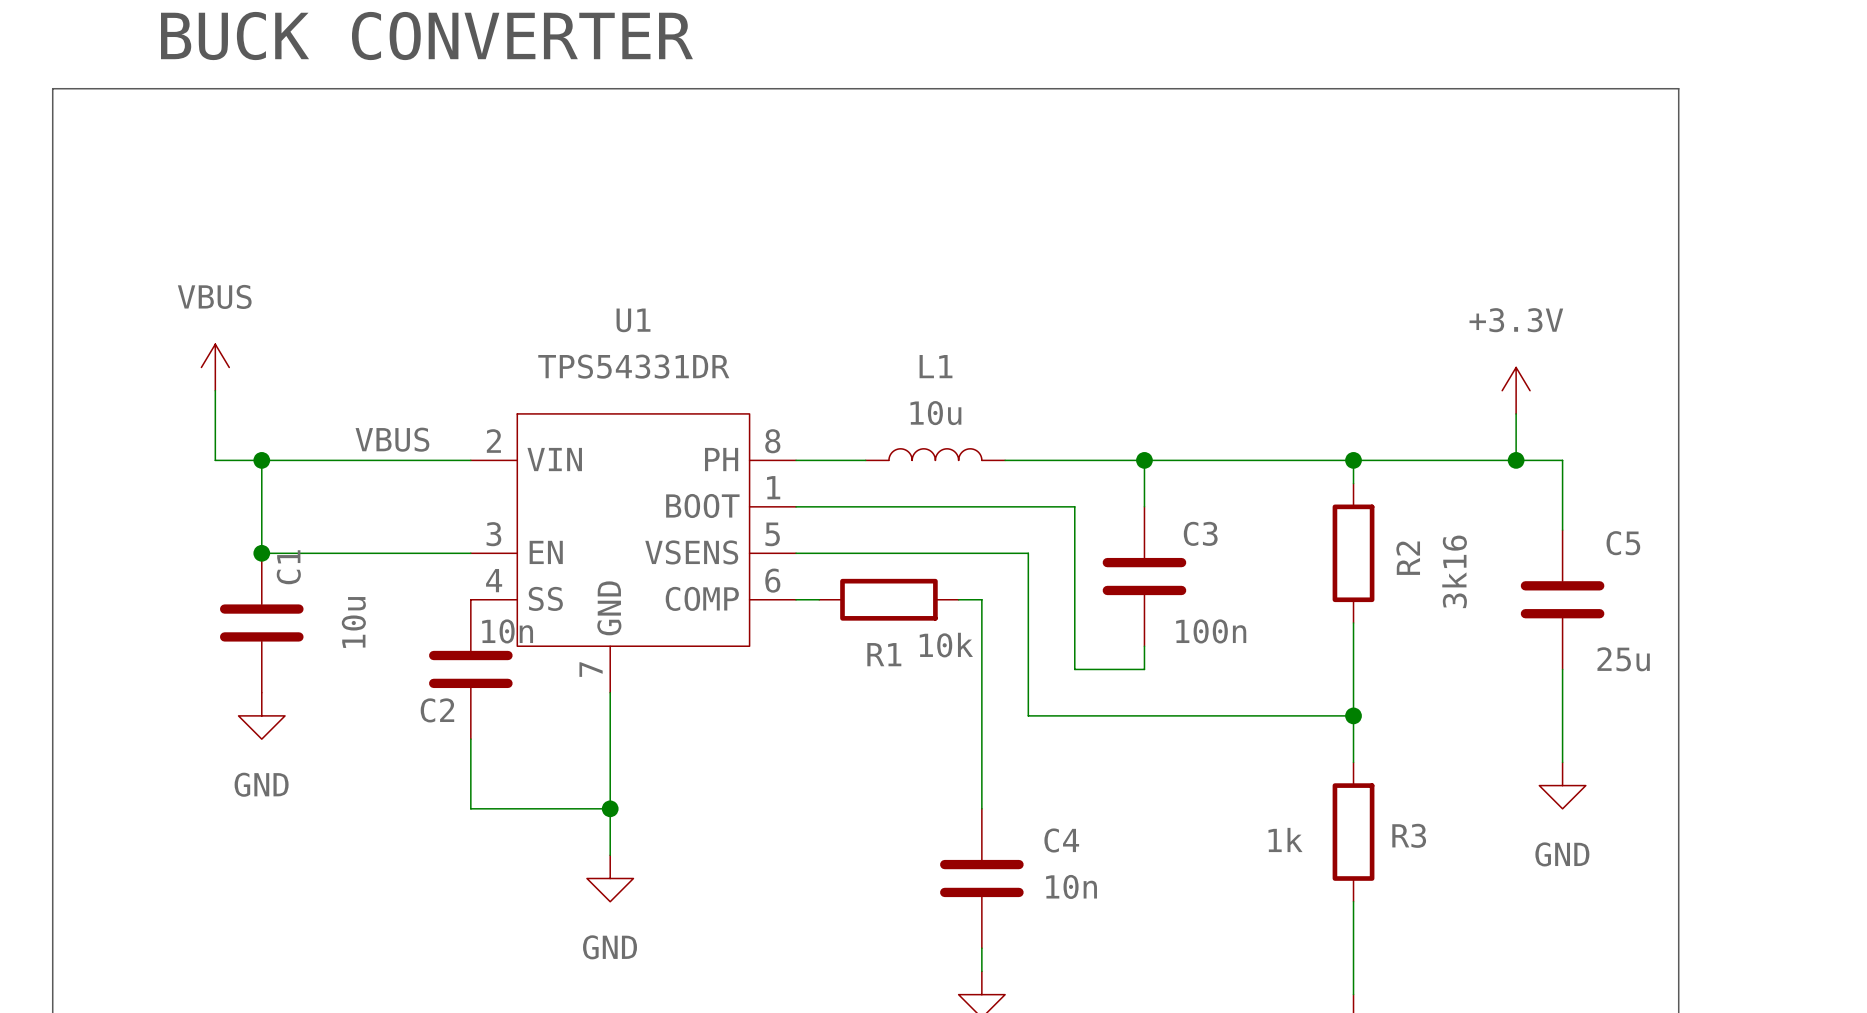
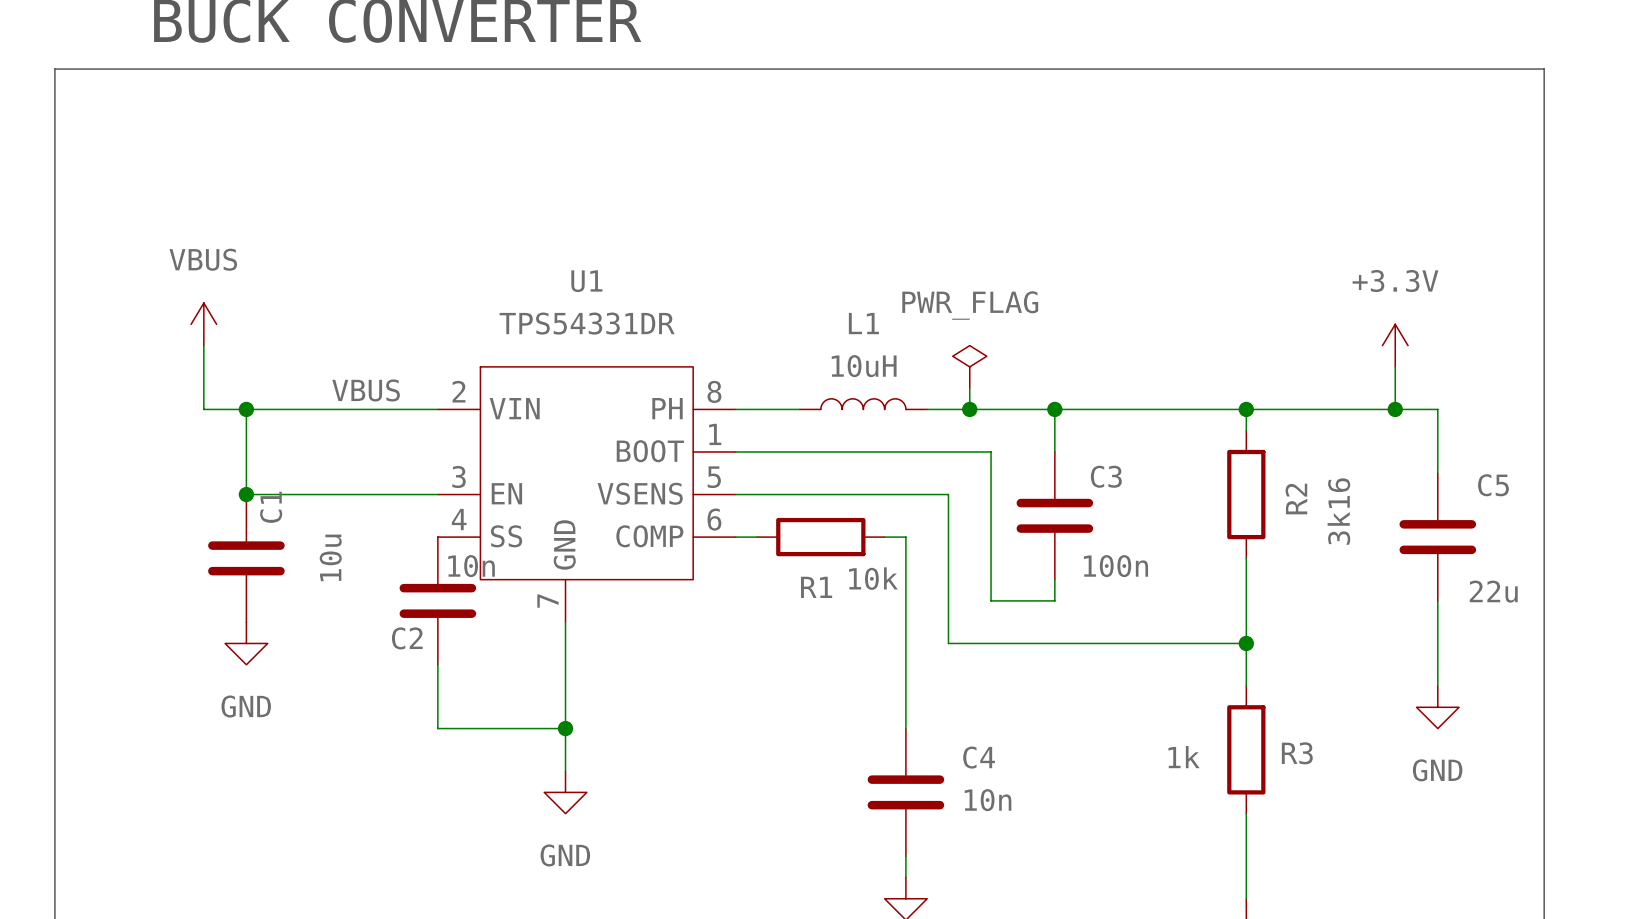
L1 value: 10u (935, 413) -> 10uH (864, 366)
power symbol: none -> PWR_FLAG (969, 366)
wire: none -> (969, 388) (969, 409)
junction: none -> (969, 409)
C5 value: 25u (1623, 659) -> 22u (1493, 591)

